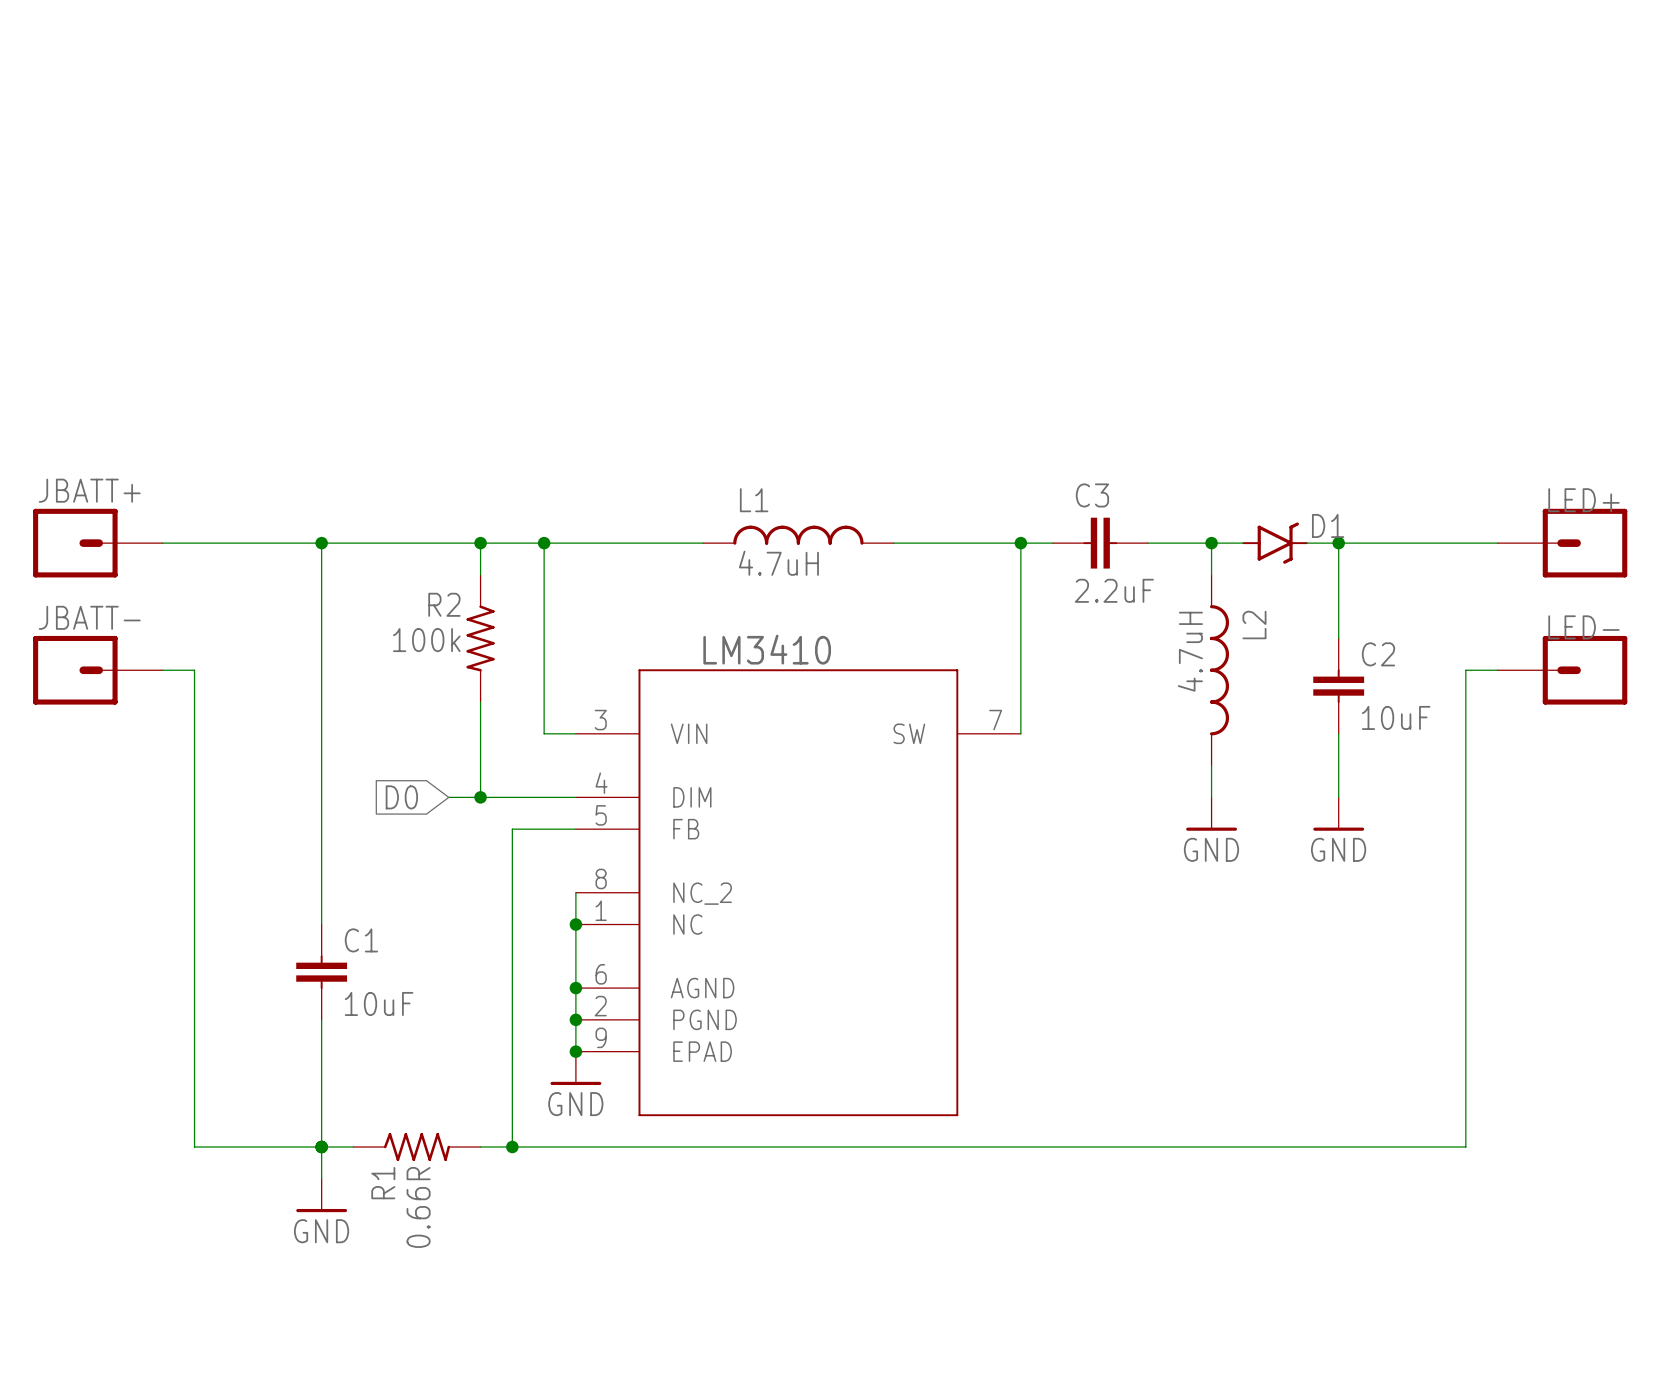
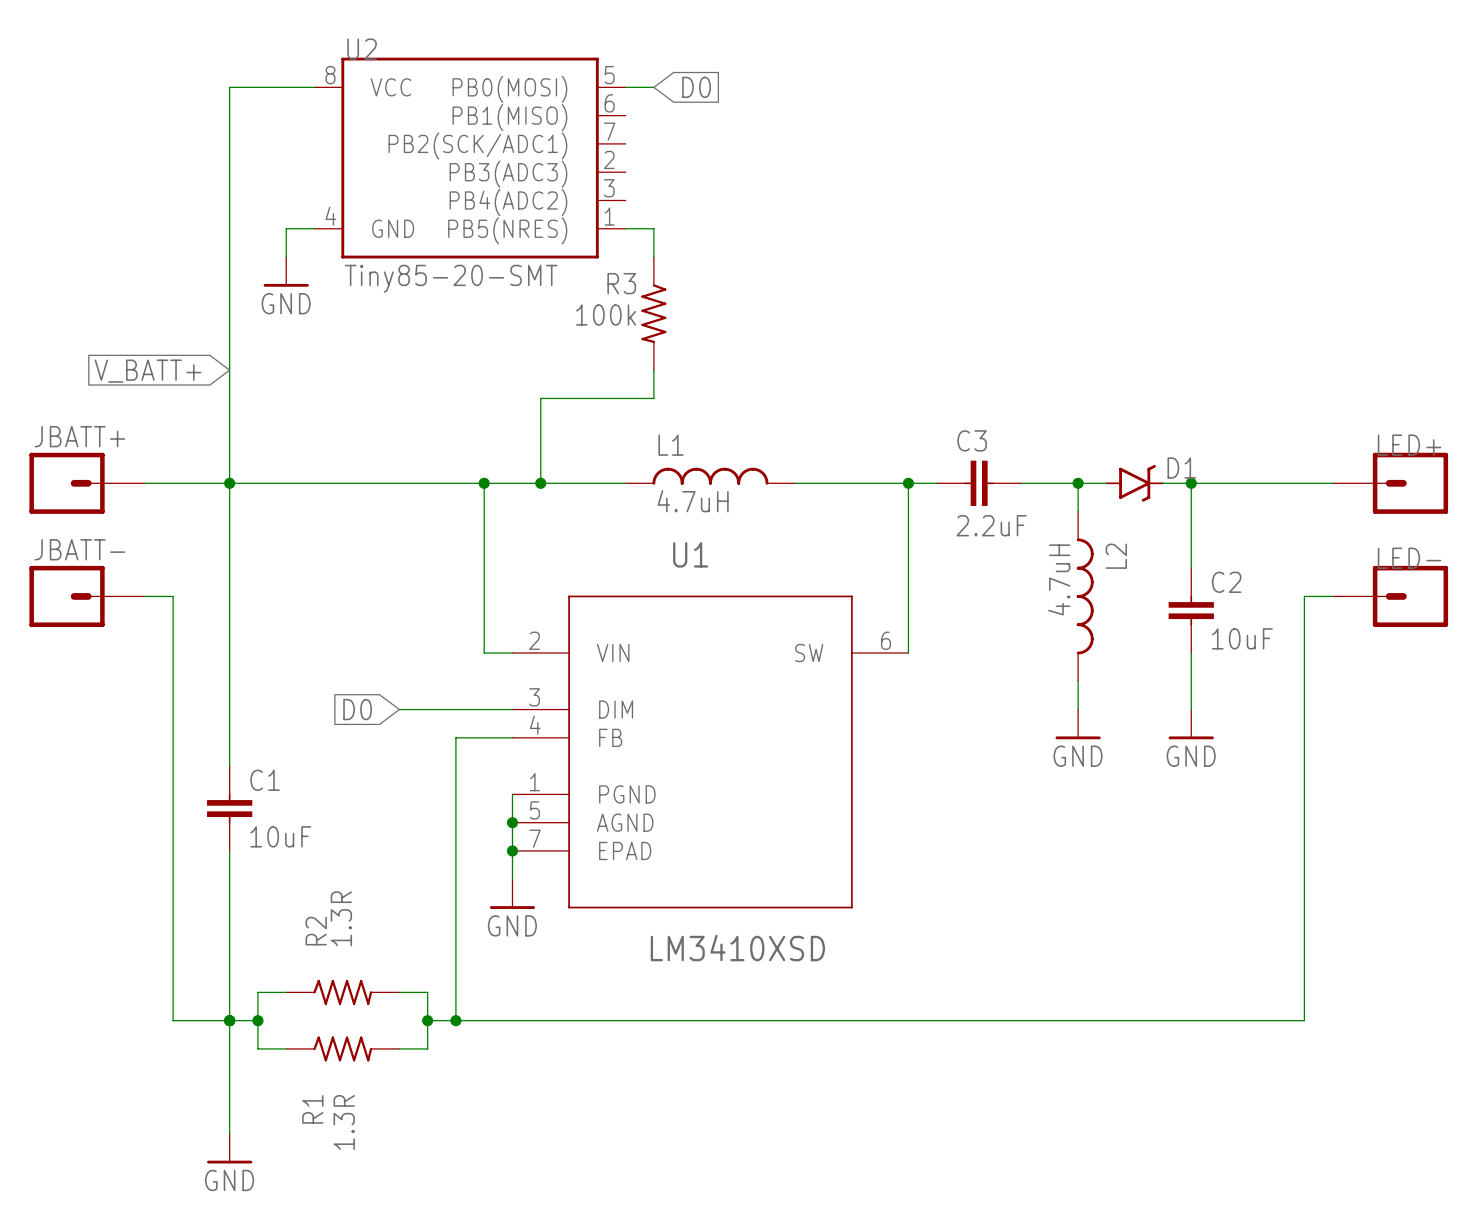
wire: none -> (314, 87) (229, 87) (229, 766)
wire: none -> (625, 87) (653, 87)
global label: none -> D0 (696, 87)
U2: none -> Tiny85-20-SMT (470, 158)
wire: none -> (314, 228) (286, 228) (286, 257)
wire: none -> (625, 228) (653, 228) (653, 257)
power symbol: none -> GND (286, 271)
R3: none -> 100k (653, 313)
wire: none -> (653, 370) (653, 398) (540, 398) (540, 483)
global label: none -> V_BATT+ (148, 371)
wire: (321, 543) (321, 924) -> none
junction position: (321, 543) -> (229, 483)
wire: (480, 543) (480, 574) -> none
junction: (480, 543) -> none
junction: none -> (540, 483)
R2 name position: R2 (444, 604) -> R2 (316, 931)
R2 rotation: 0° (480, 638) -> 90° counterclockwise (342, 992)
R2 position: (480, 638) -> (342, 992)
R2 value: 100k (426, 640) -> 1.3R (341, 918)
wire: (480, 702) (480, 797) -> none
junction: (480, 797) -> none
U1: none -> LM3410XSD (710, 751)
part: LM3410 (798, 892) -> none
wire: none -> (229, 850) (229, 1133)
junction: none -> (512, 850)
C1 position: (321, 972) -> (229, 808)
junction: (575, 988) -> none
wire: (321, 1019) (321, 1178) -> (286, 992) (257, 992) (257, 1048) (286, 1048)
junction: (575, 1019) -> none
junction: (575, 1051) -> none
power symbol position: GND (575, 1068) -> GND (512, 894)
wire: none -> (399, 992) (427, 992) (427, 1048) (399, 1048)
junction: none -> (229, 1020)
wire: (289, 1146) (353, 1146) -> none
junction: none -> (257, 1020)
junction: (321, 1146) -> none
R1 position: (417, 1146) -> (342, 1048)
junction: none -> (427, 1020)
R1 name position: R1 (383, 1183) -> R1 (312, 1109)
power symbol position: GND (321, 1195) -> GND (229, 1148)
R1 value: 0.66R (418, 1207) -> 1.3R (344, 1122)

